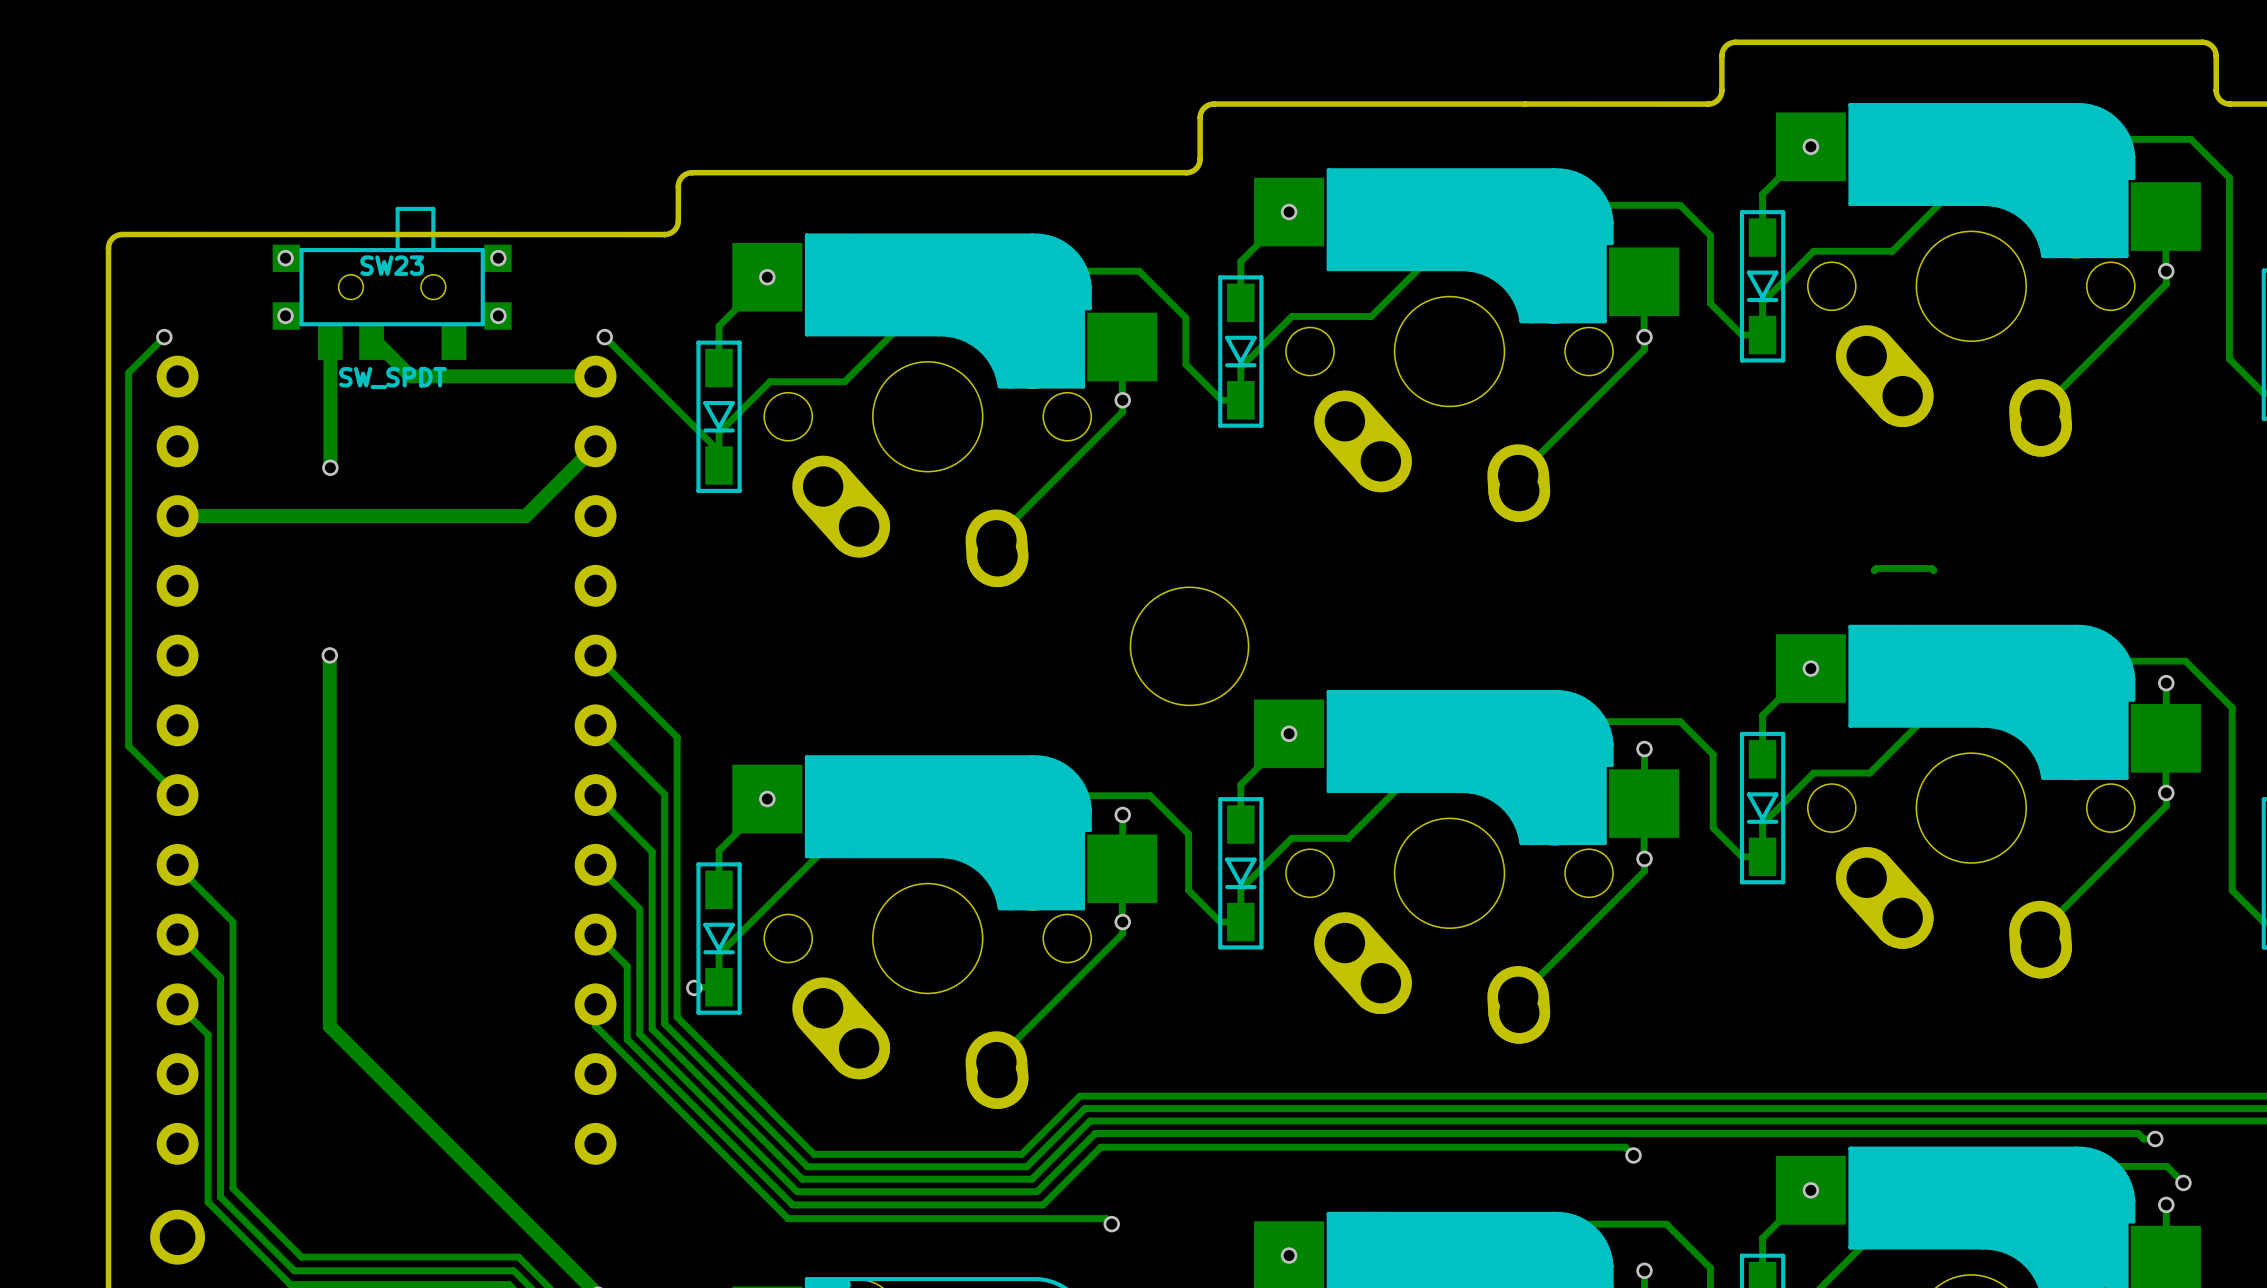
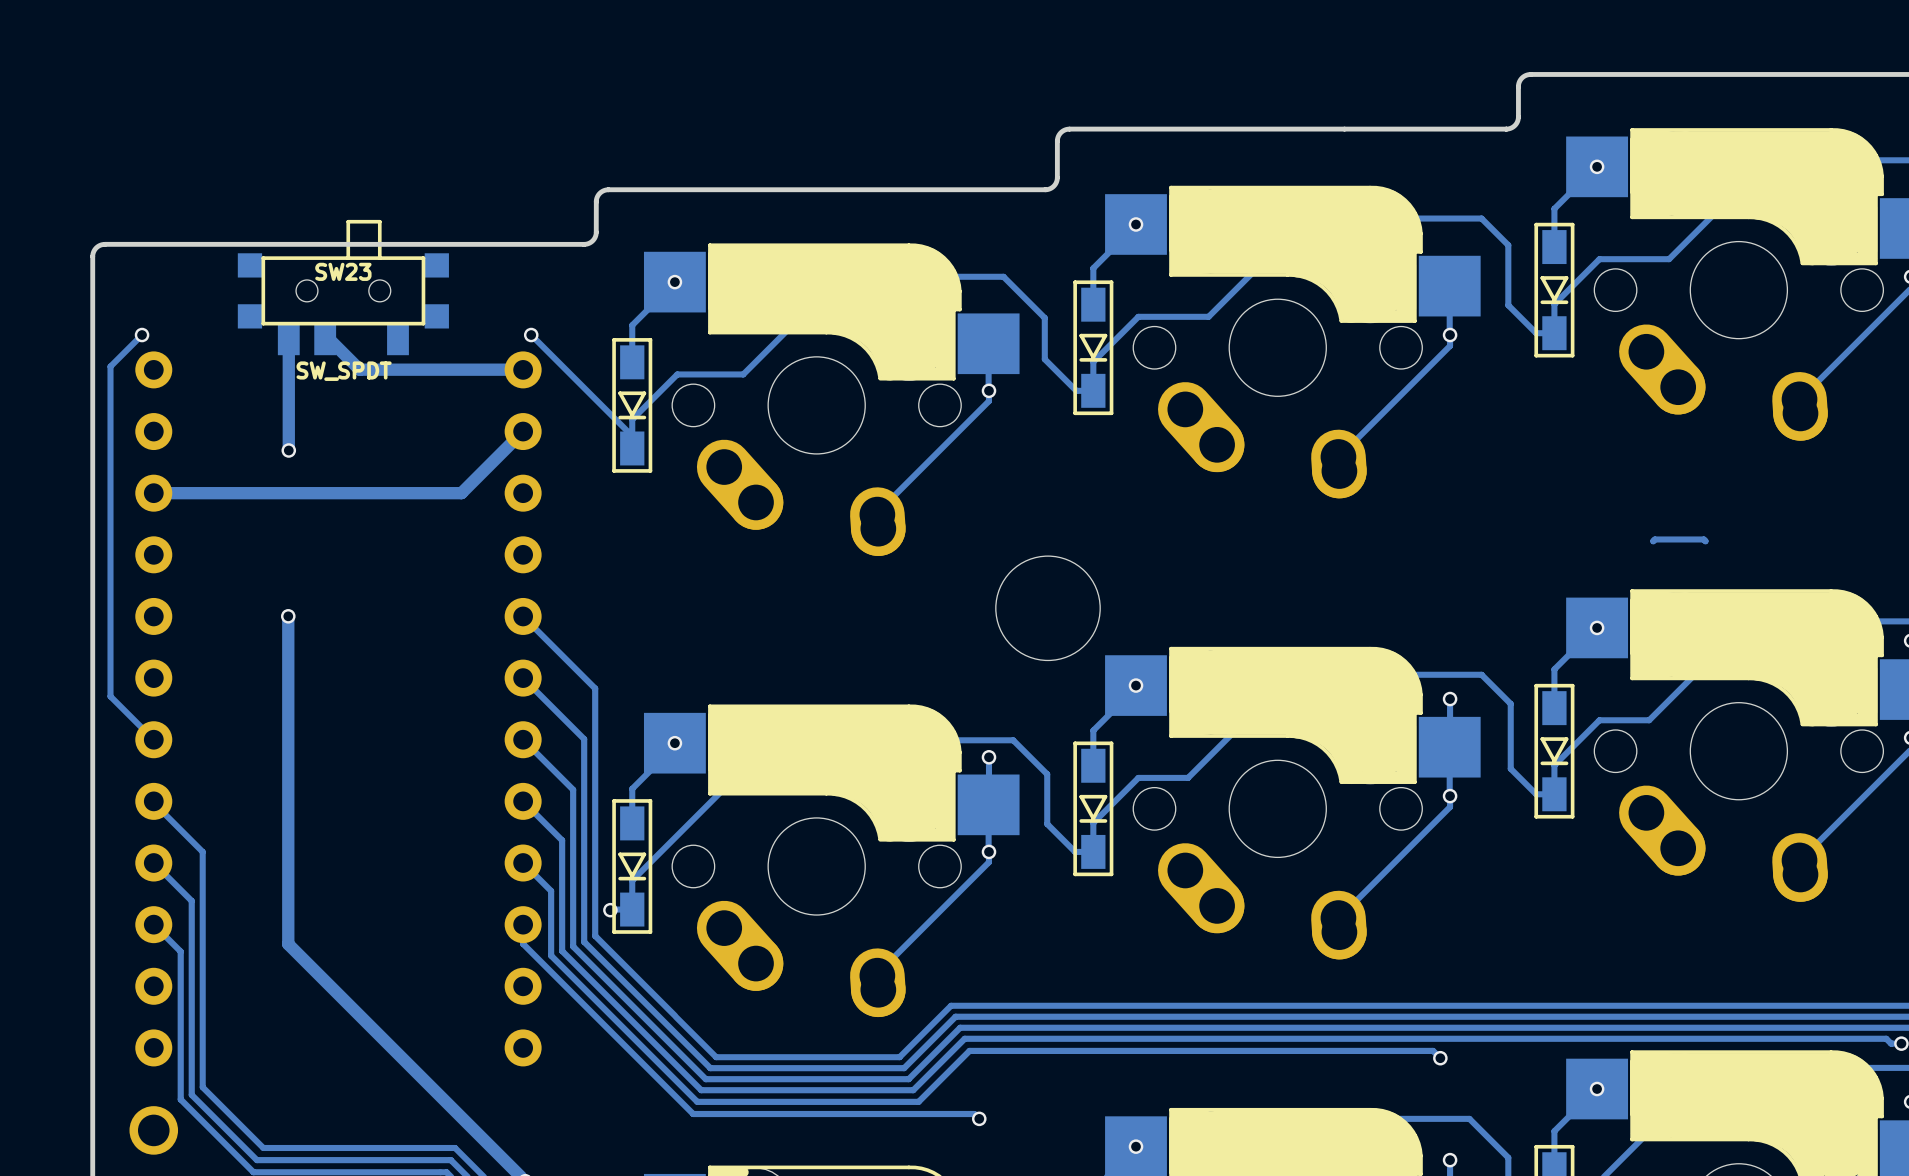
via: (285, 258) -> none
via: (498, 258) -> none
via: (285, 315) -> none
via: (498, 315) -> none

